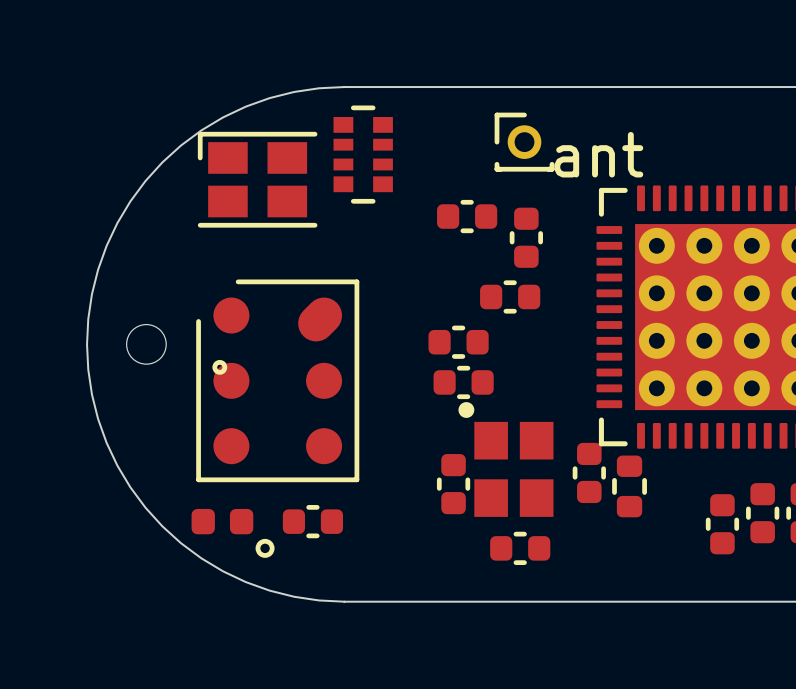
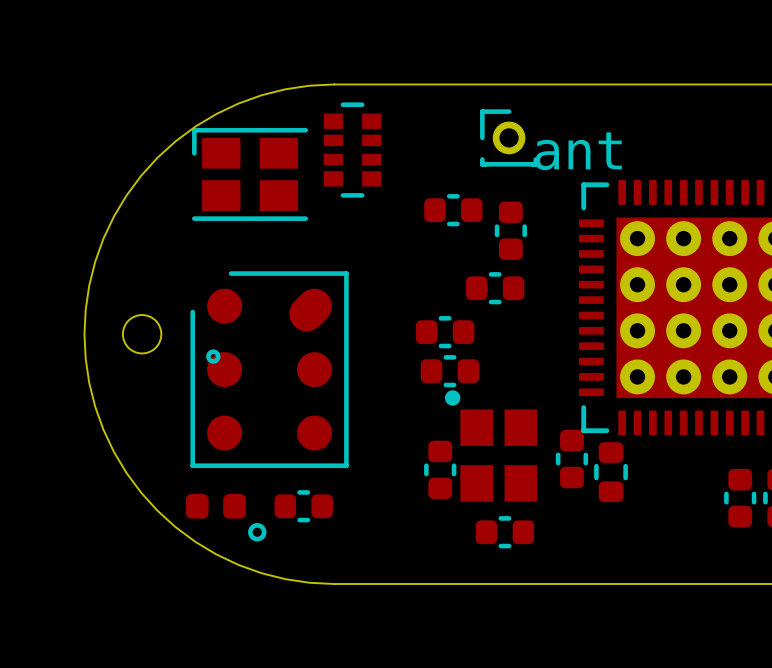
part: (722, 524) -> none

